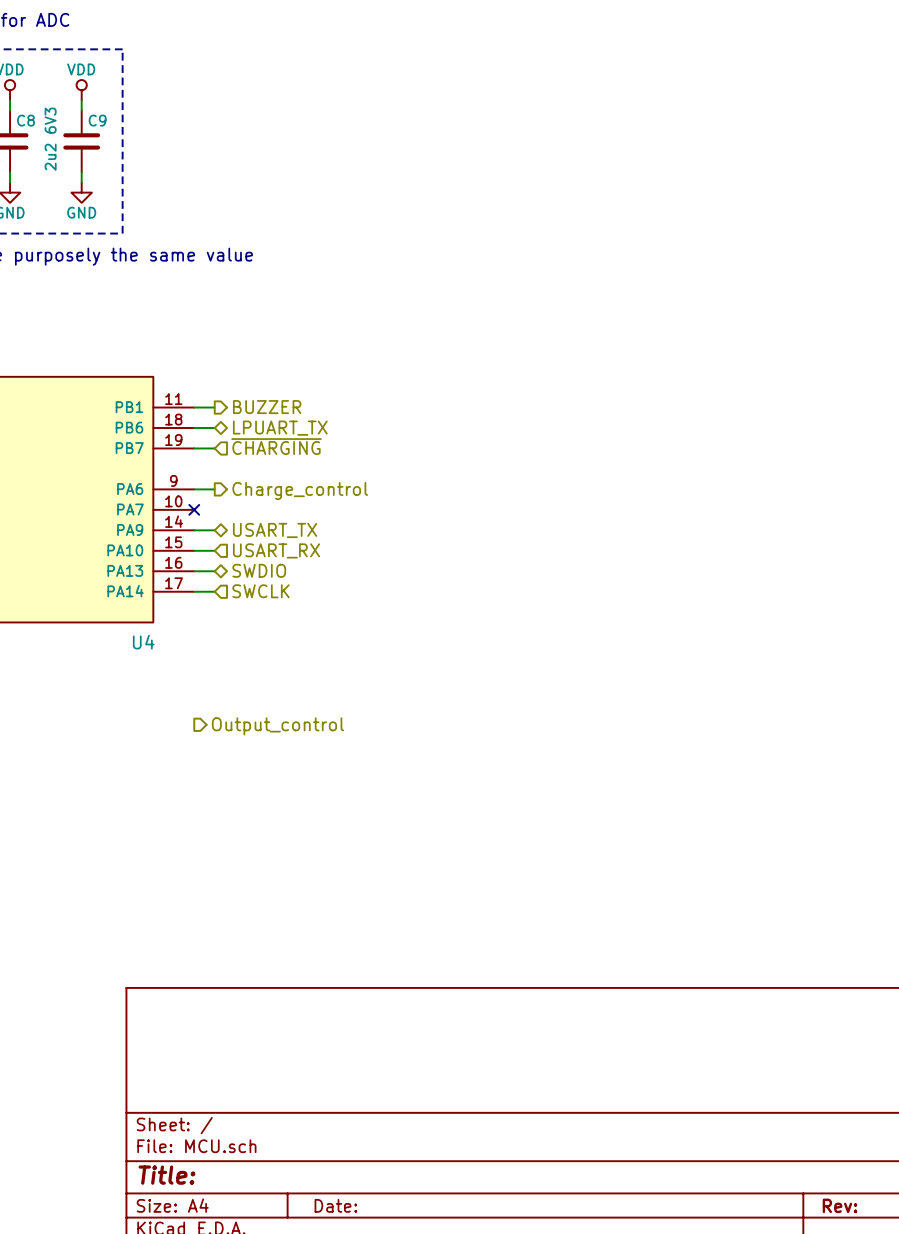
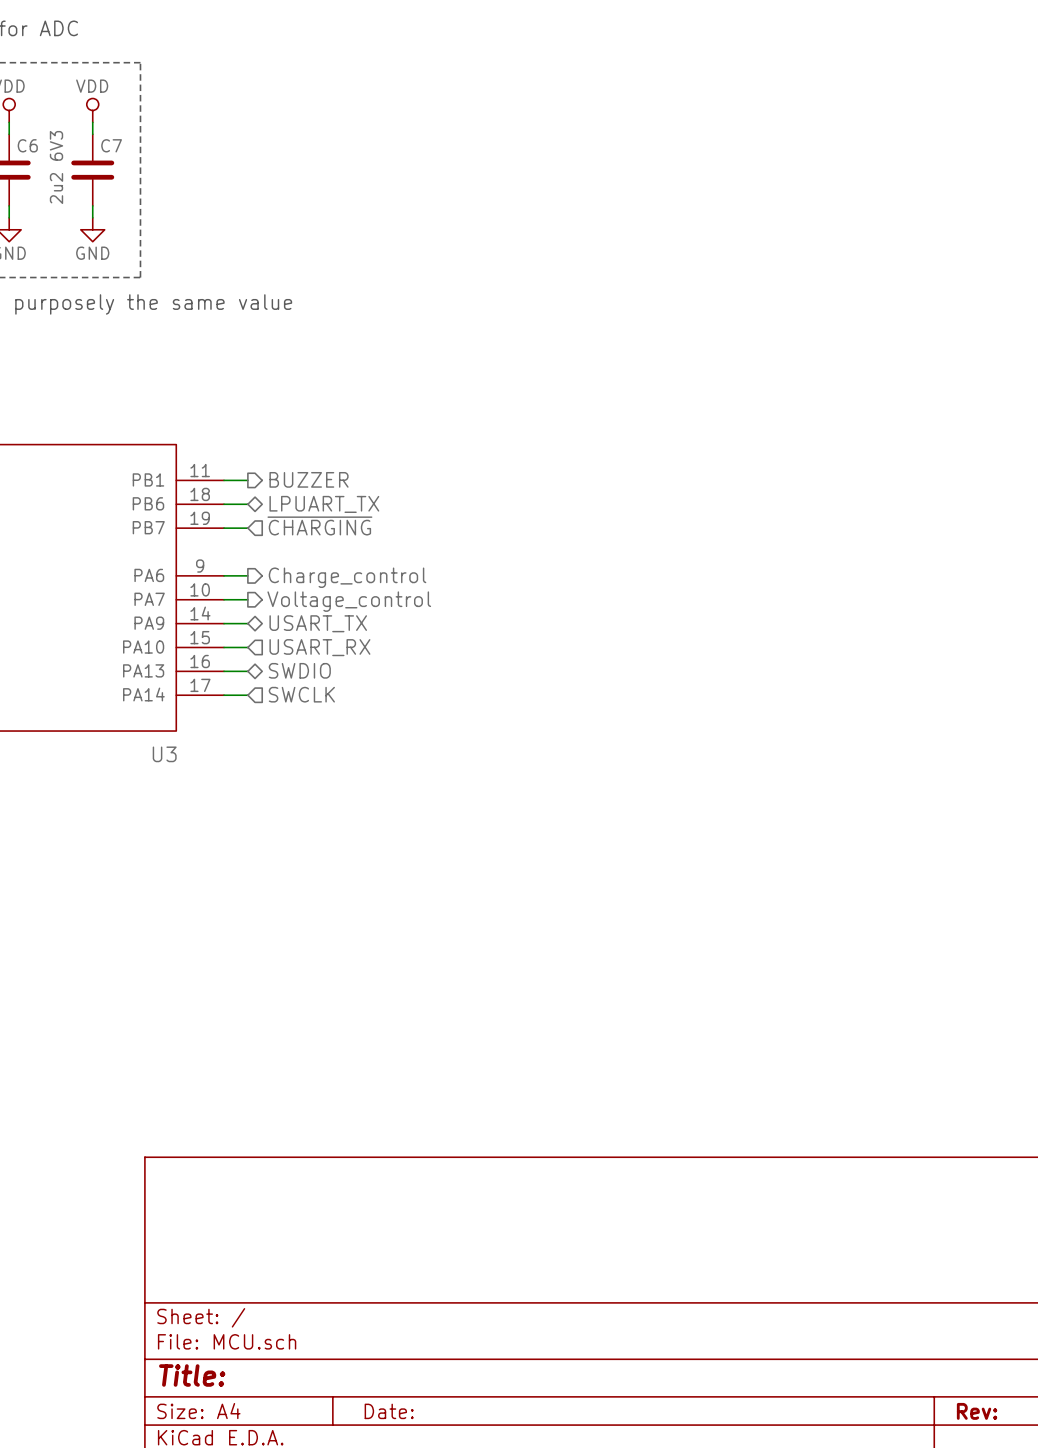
C8 name: C8 (25, 120) -> C6 (27, 145)
C9 name: C9 (97, 120) -> C7 (111, 145)
wire: none -> (224, 599) (247, 599)
no-connect mark: (194, 509) -> none
hierarchical label: none -> Voltage_control (349, 601)
U4 name: U4 (143, 642) -> U3 (164, 754)
hierarchical label: Output_control (277, 726) -> none

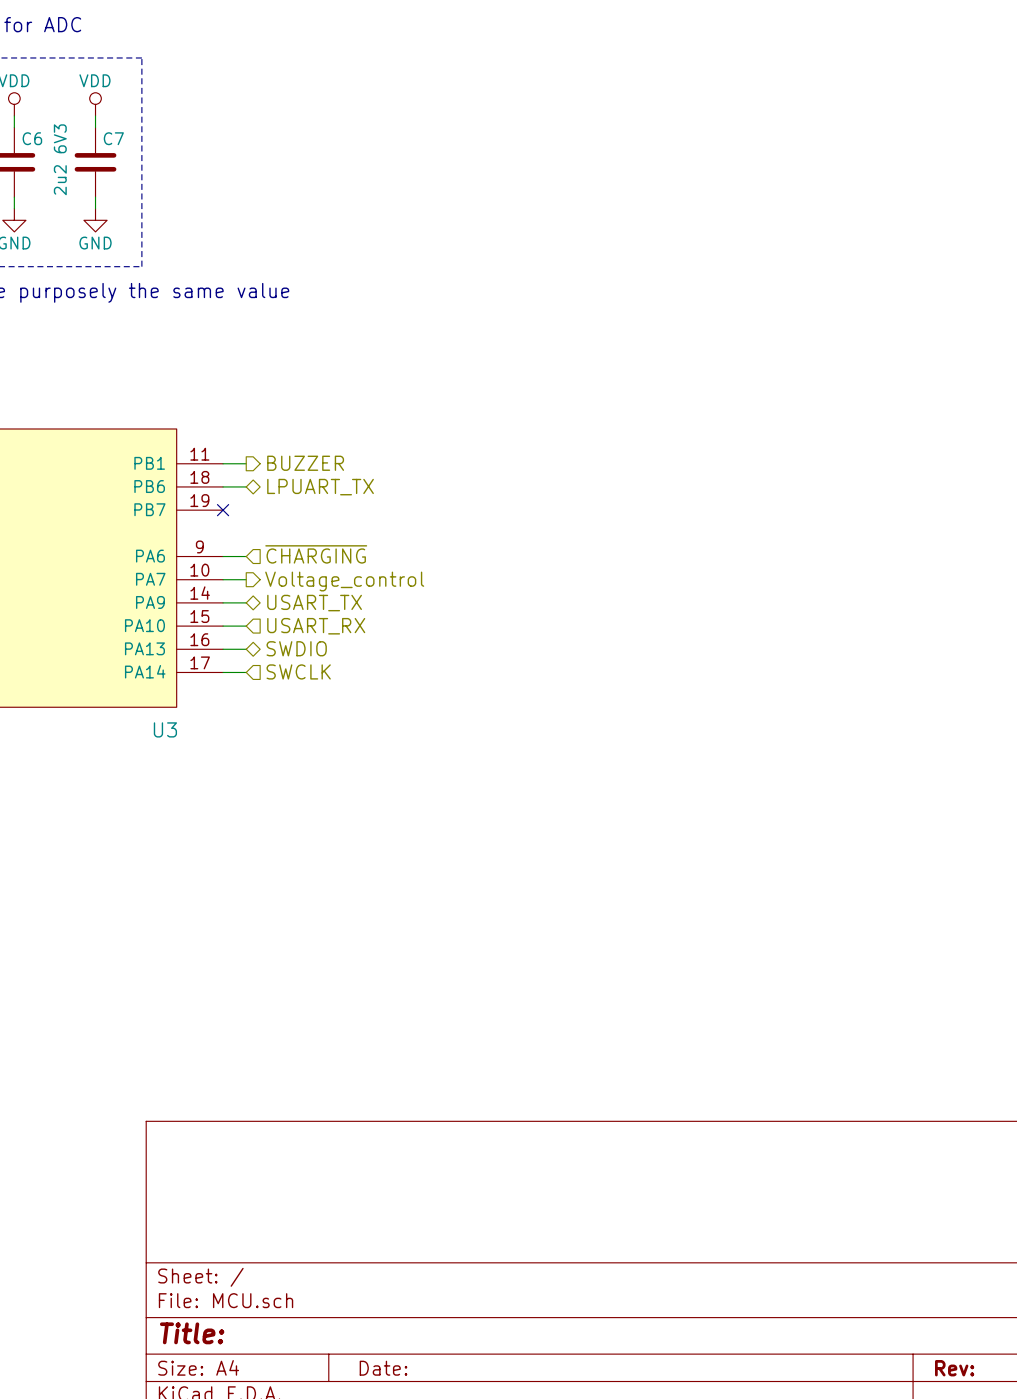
hierarchical label: ~{CHARGING} (319, 525) -> none
wire: (224, 528) (247, 528) -> none
no-connect mark: none -> (223, 510)
hierarchical label shape: output (347, 577) -> input (316, 554)
hierarchical label: Charge_control (347, 577) -> ~{CHARGING} (316, 554)

